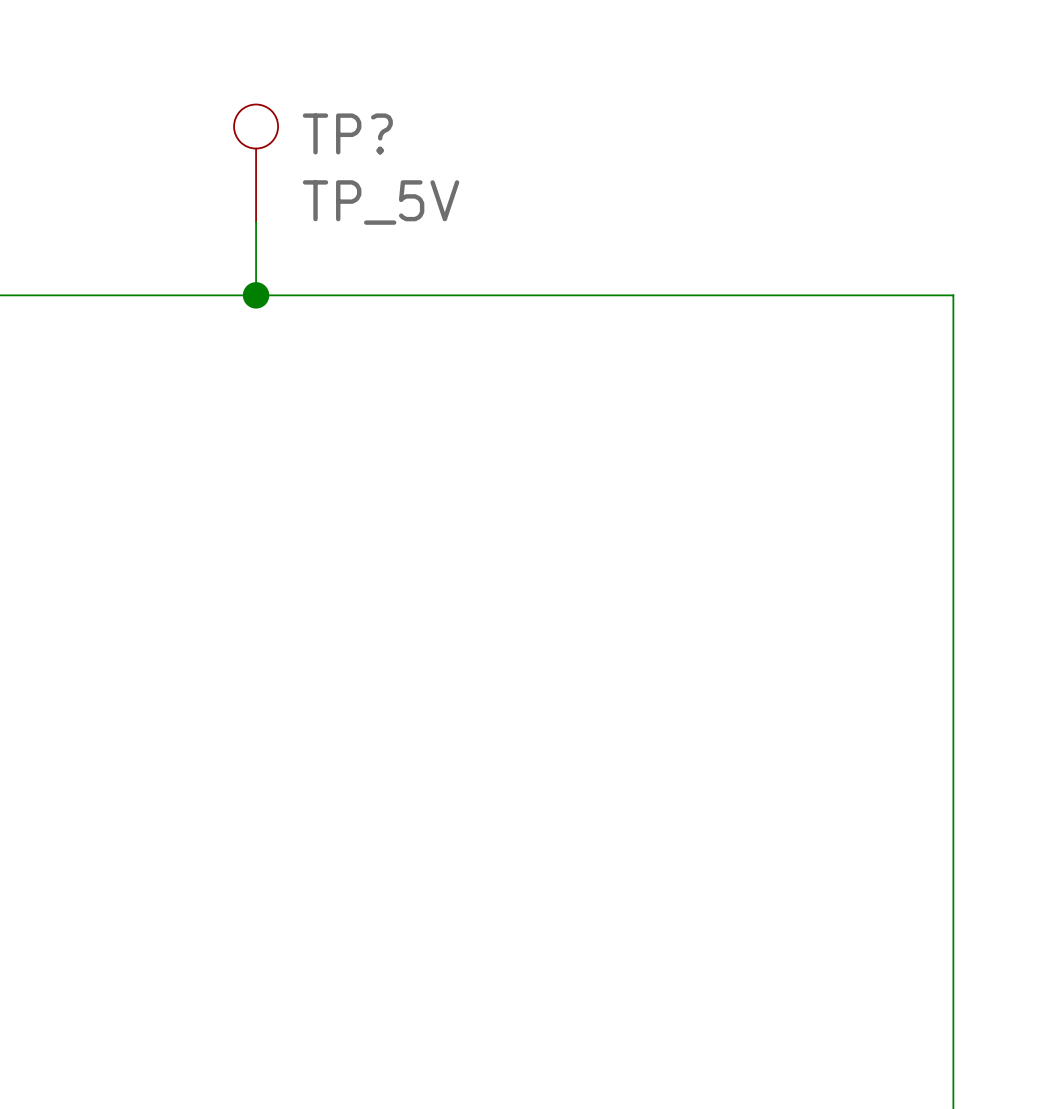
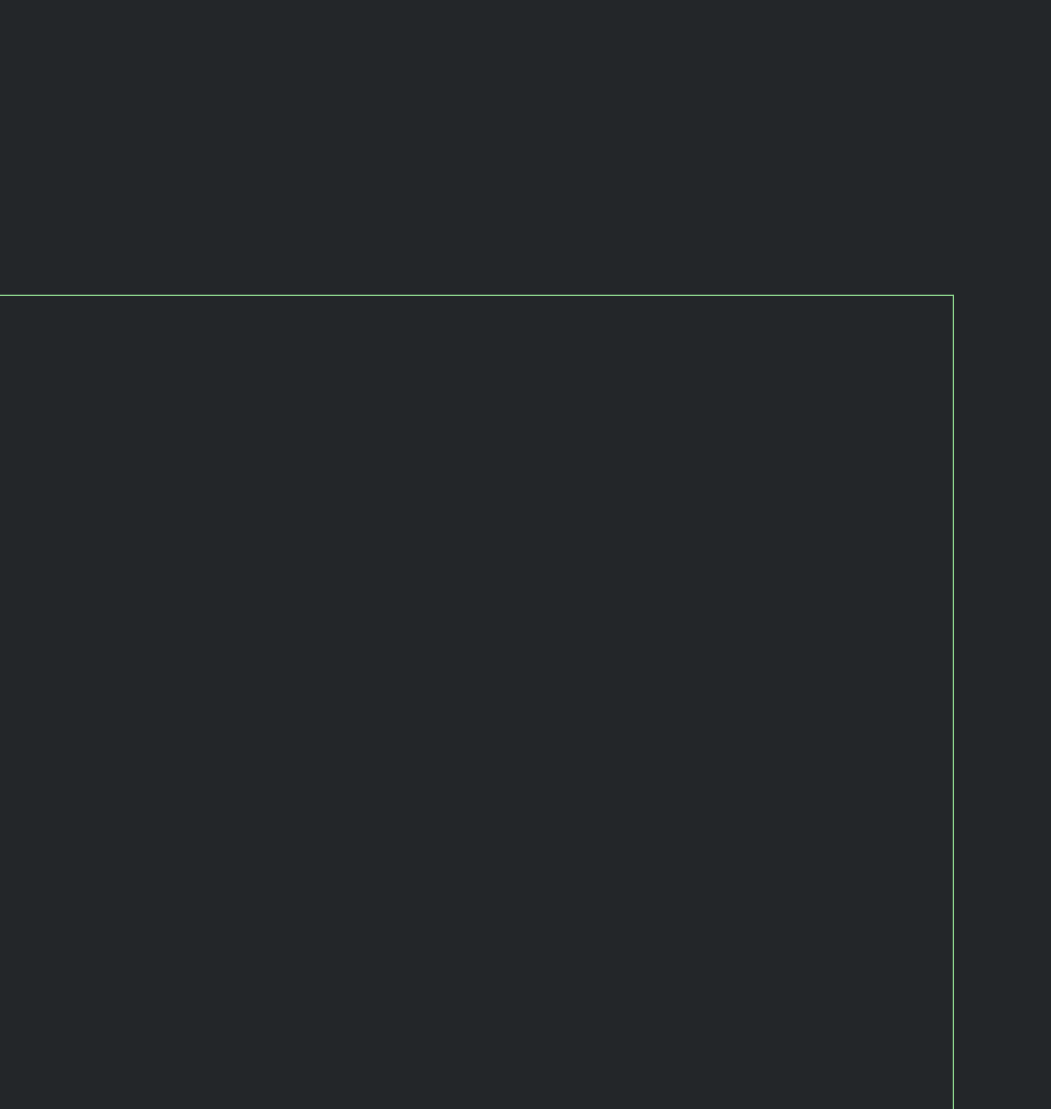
TP?: TP_5V (256, 163) -> none
wire: (256, 221) (256, 295) -> none
junction: (256, 295) -> none

